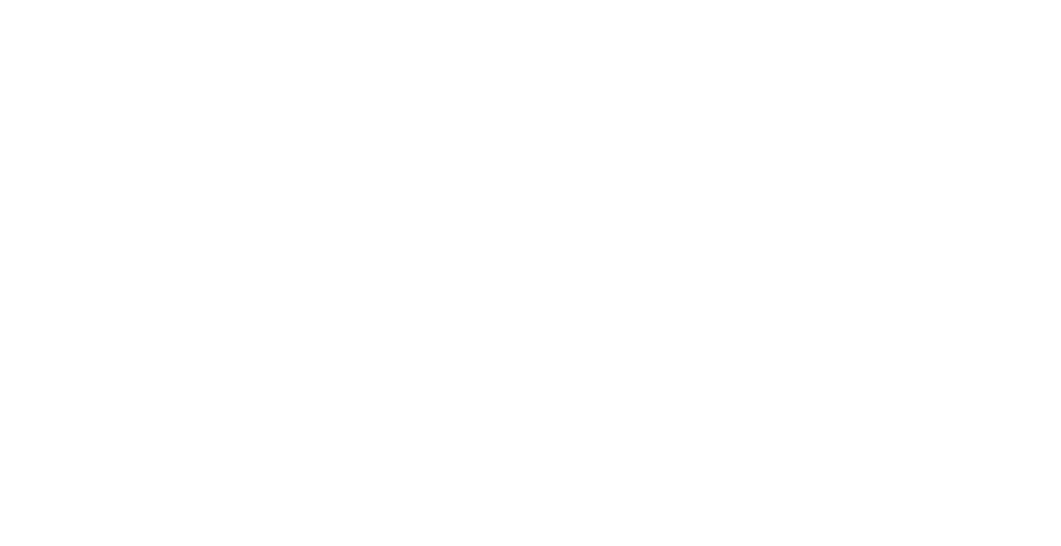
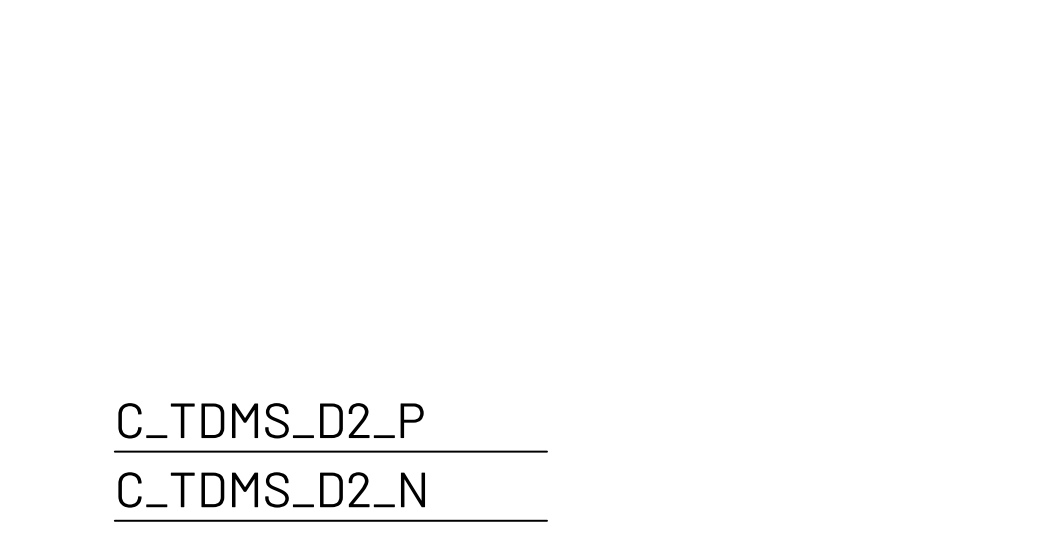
label: none -> C_TDMS_D2_P (271, 420)
wire: none -> (114, 451) (546, 451)
label: none -> C_TDMS_D2_N (271, 489)
wire: none -> (114, 520) (546, 520)

